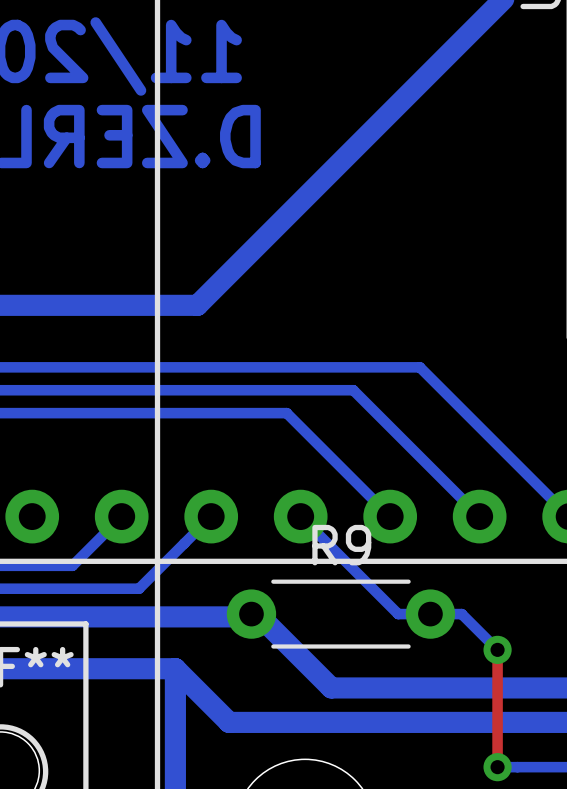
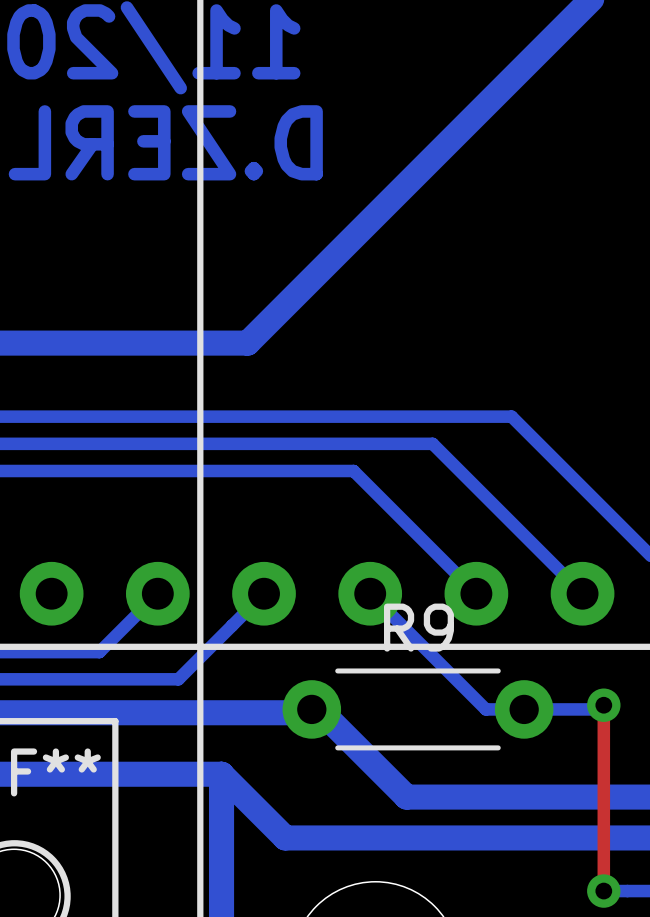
top track: none -> (603, 705) (603, 751)
bottom track: (461, 614) (497, 649) -> (561, 709) (599, 709) (603, 705)
via position: (497, 649) -> (603, 705)

